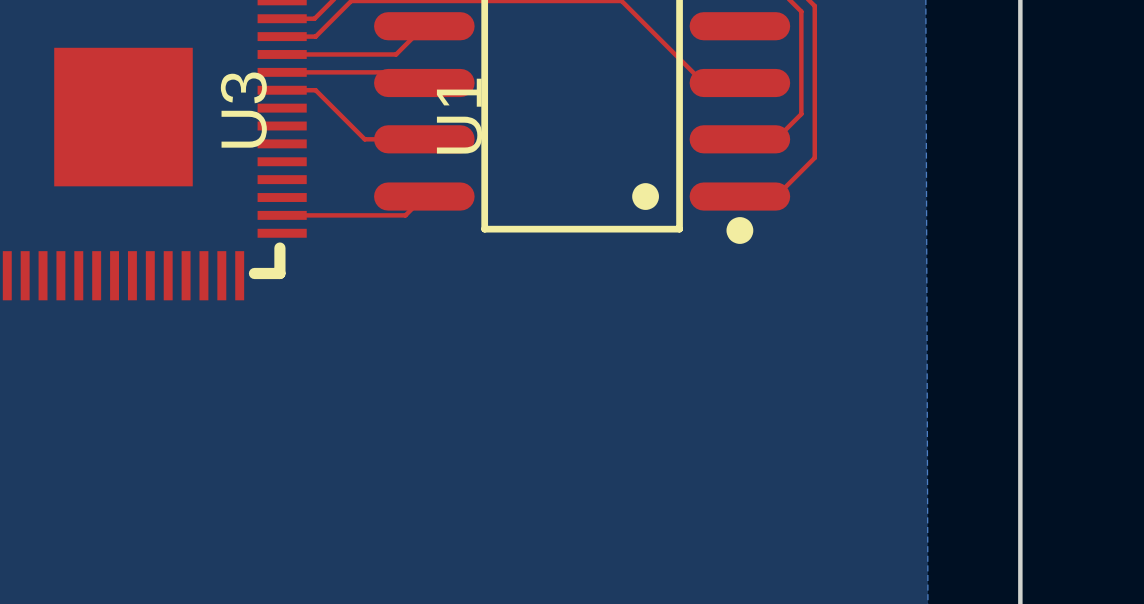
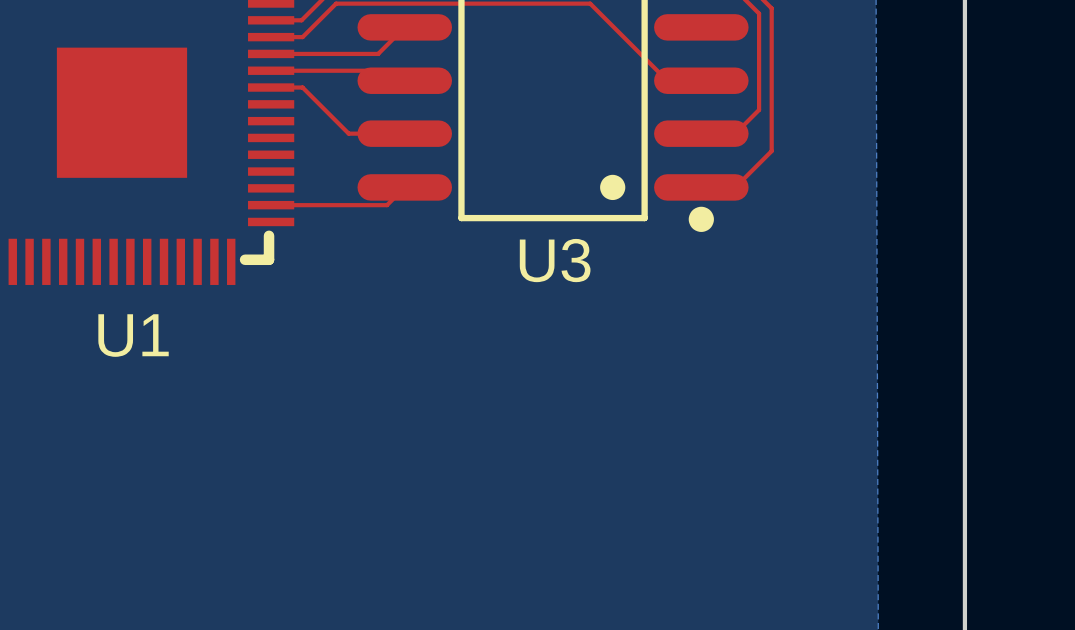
U3 name rotation: 0° (243, 110) -> 90° clockwise (555, 260)
U3 name position: U3 (243, 110) -> U3 (555, 260)
U1 name rotation: 0° (459, 116) -> 90° clockwise (133, 335)
U1 name position: U1 (459, 116) -> U1 (133, 335)

